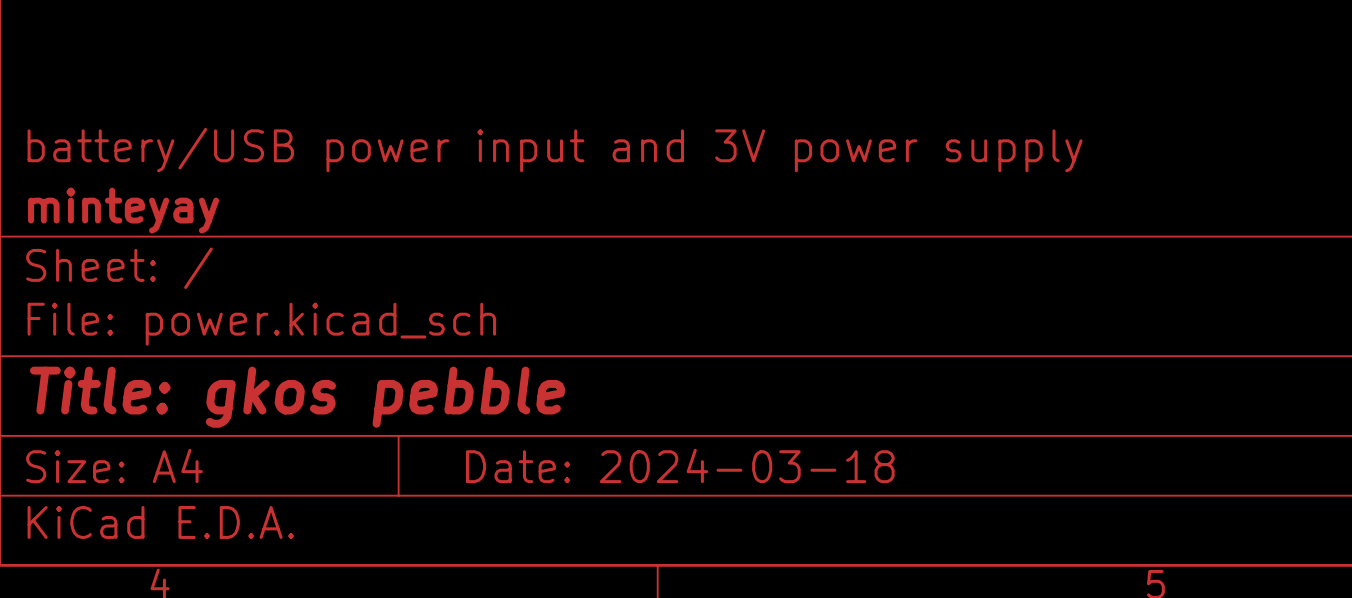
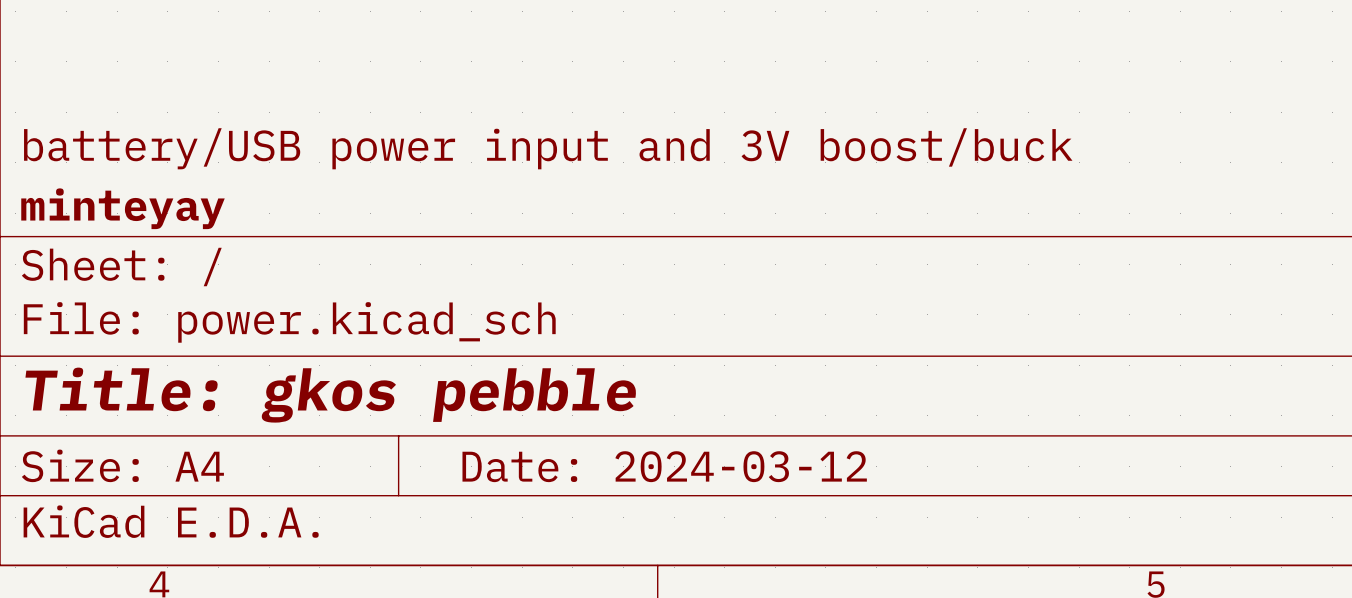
title block: battery/USB power input and 3V power supply (555, 150) -> battery/USB power input and 3V boost/buck (548, 148)
title block: Date: 2024-03-18 (680, 465) -> Date: 2024-03-12 (664, 466)

